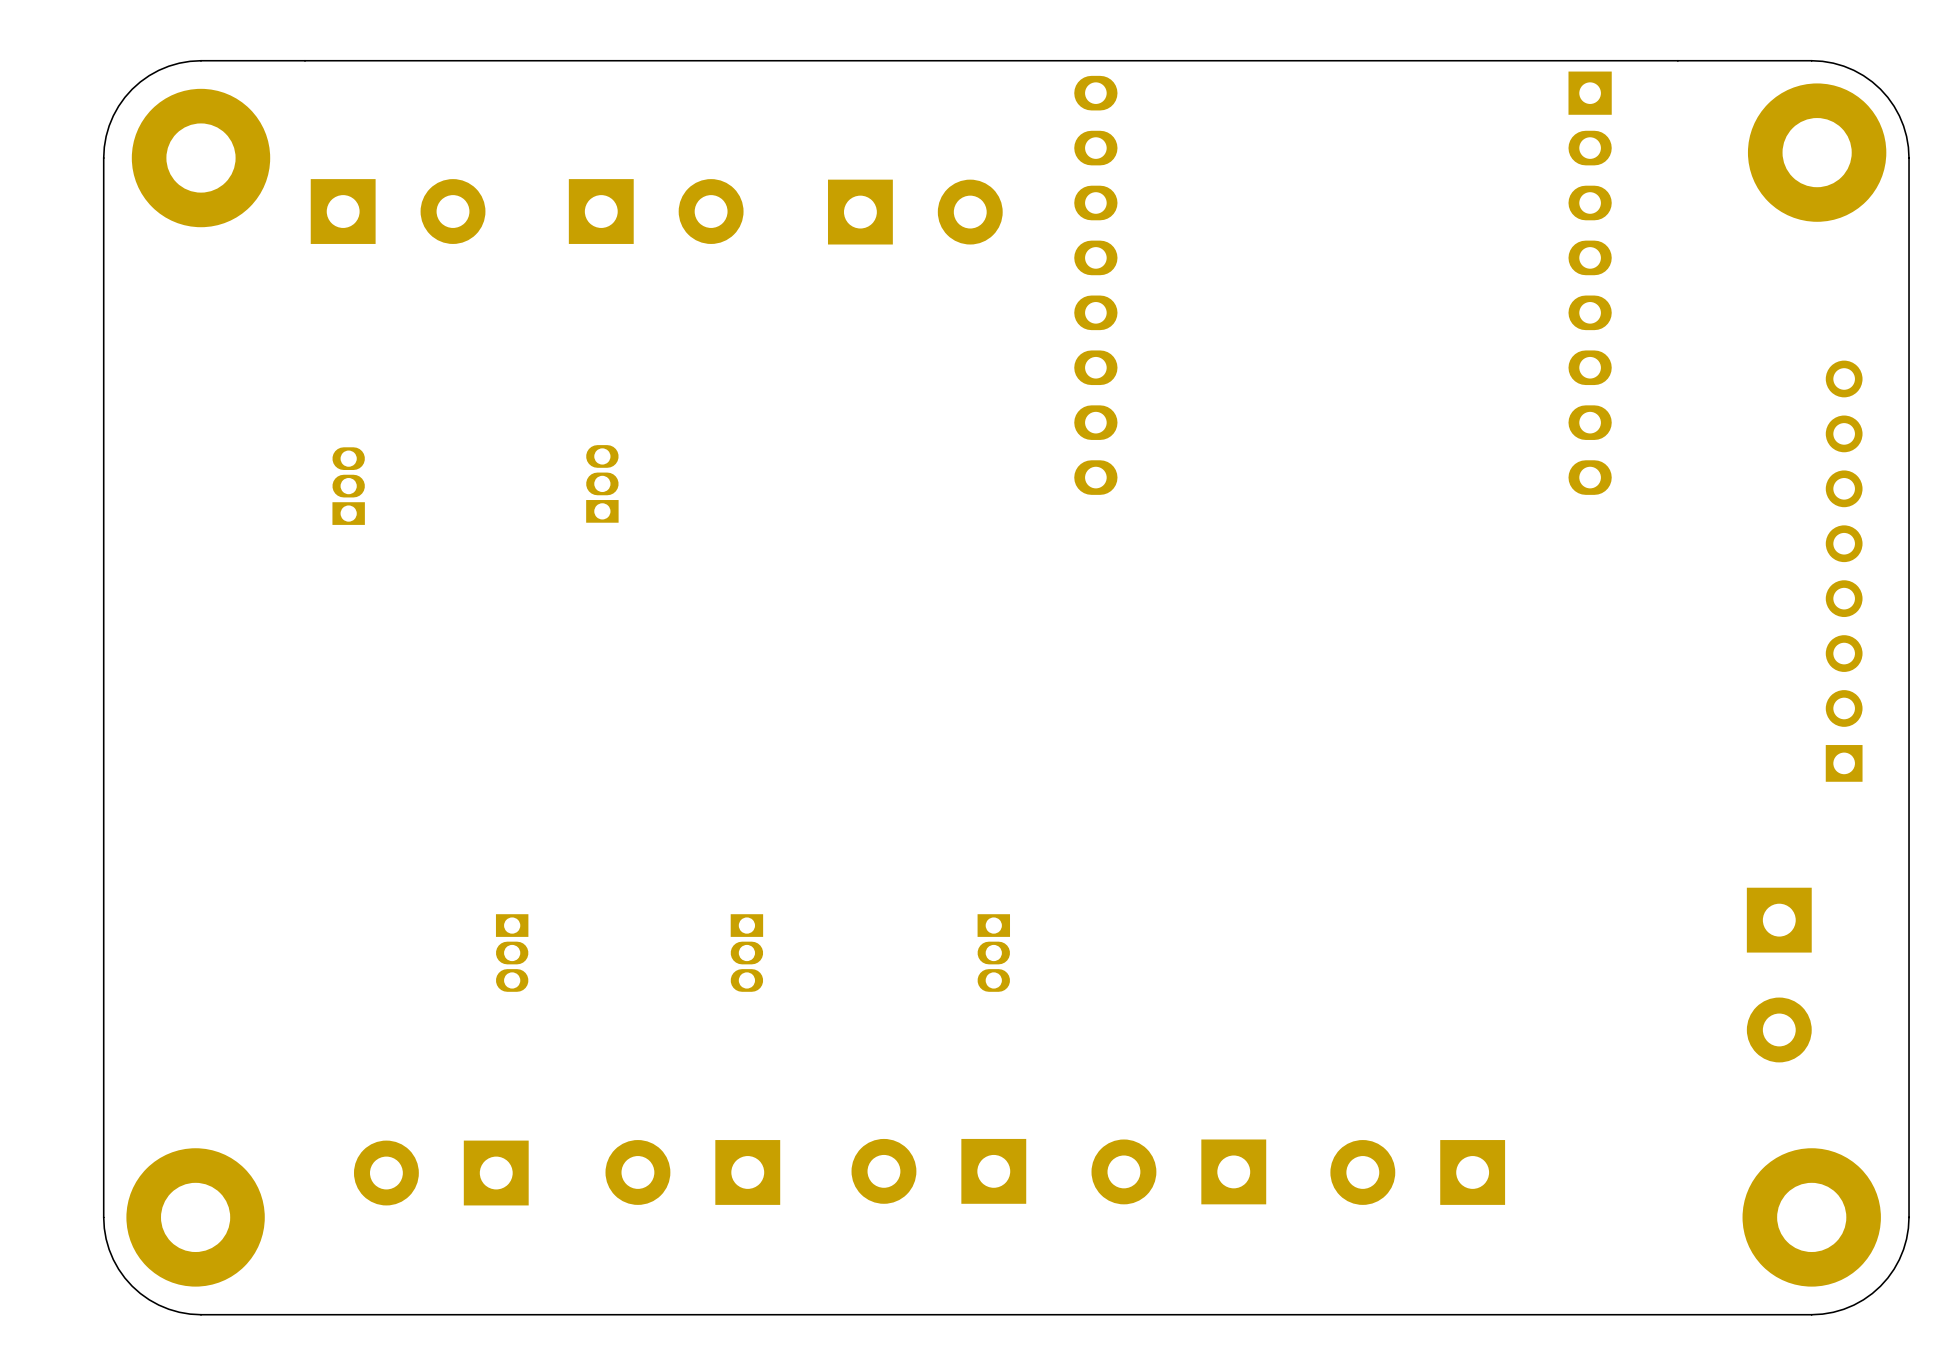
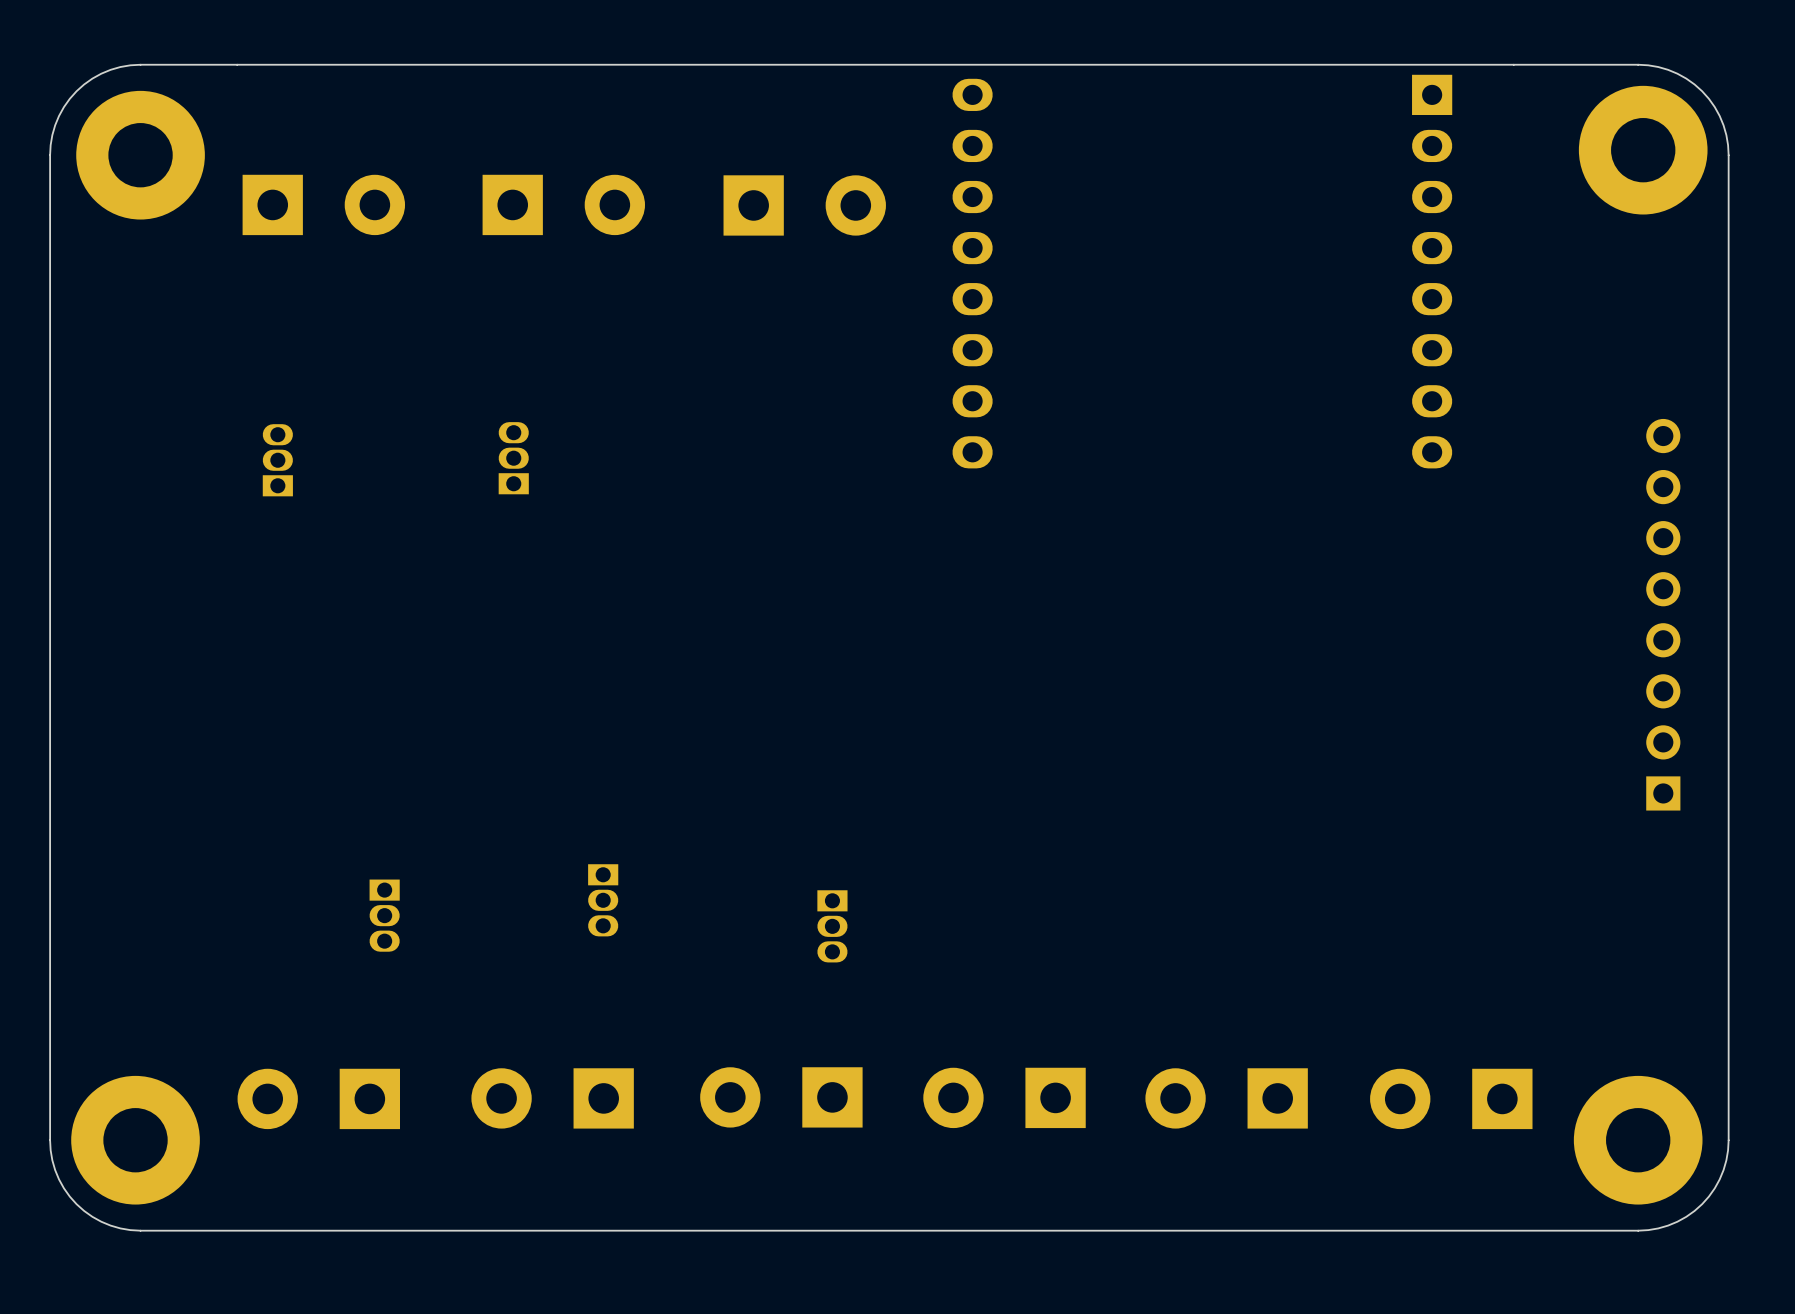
part position: (1844, 571) -> (1663, 614)
part position: (512, 953) -> (384, 915)
part position: (746, 953) -> (603, 900)
part position: (993, 953) -> (832, 926)
part: (1779, 975) -> none
part position: (938, 1171) -> (781, 1097)
part position: (1178, 1171) -> (1004, 1097)
part position: (692, 1172) -> (552, 1098)
part position: (1417, 1172) -> (1226, 1098)
part position: (441, 1173) -> (318, 1098)
part: none -> (1451, 1098)

